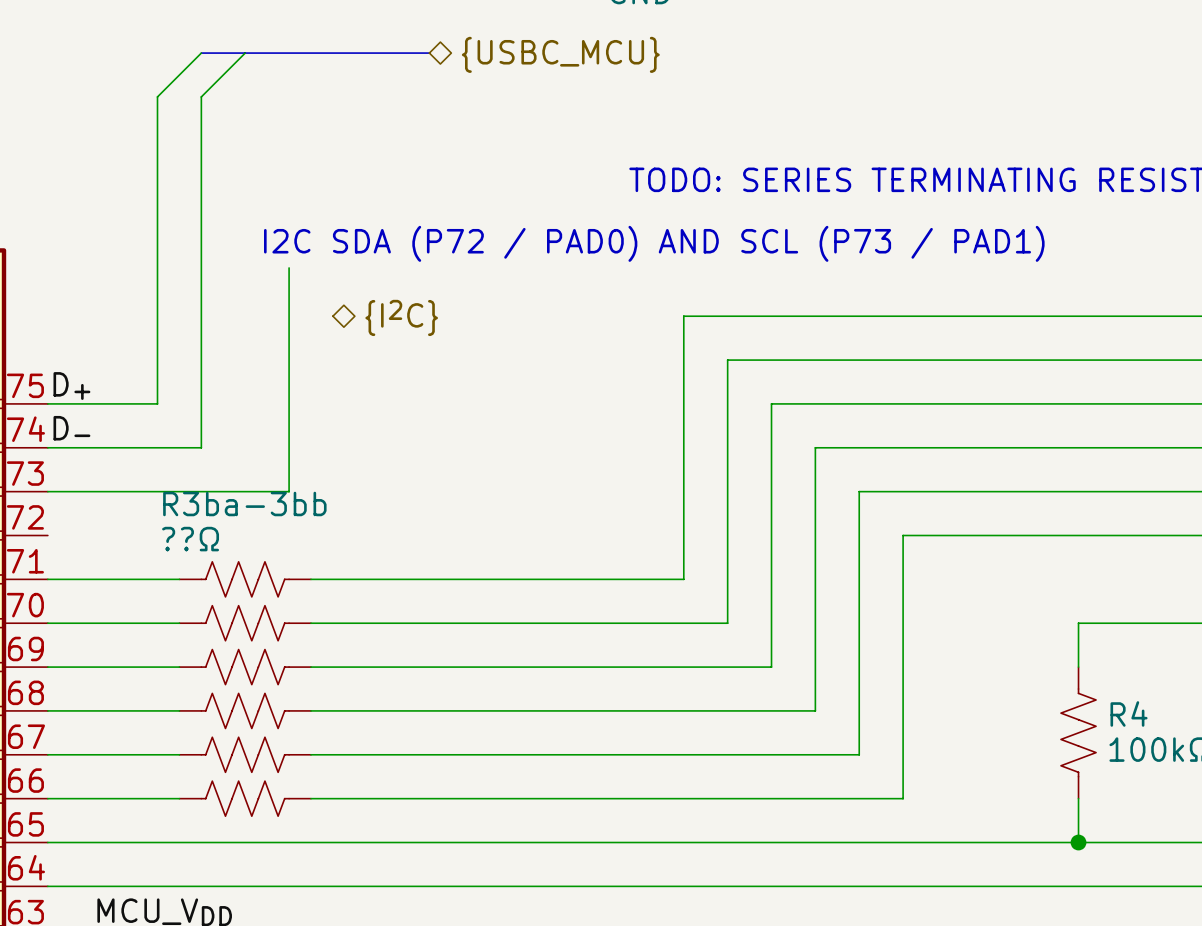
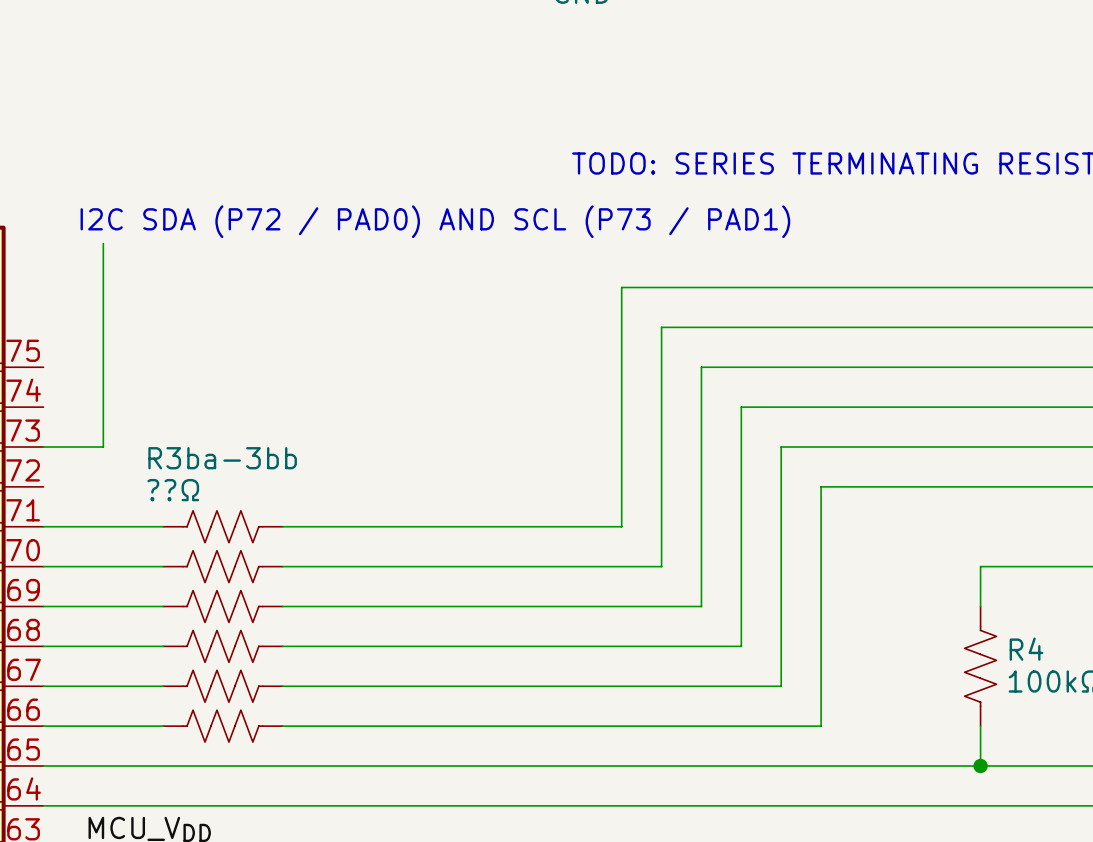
wire: (201, 53) (157, 96) (157, 403) (47, 403) -> none
bus: (201, 53) (429, 53) -> none
wire: (245, 53) (201, 96) (201, 447) (47, 447) -> none
hierarchical label: {USBC_MCU} (560, 54) -> none
text position: I2C SDA (P72 / PAD0) AND SCL (P73 / PAD1) (654, 243) -> I2C SDA (P72 / PAD0) AND SCL (P73 / PAD1) (435, 221)
wire: (289, 267) (289, 491) (113, 491) -> (103, 243) (103, 447)
hierarchical label: {I2C} (401, 317) -> none
label: D+ (71, 386) -> none
label: D- (71, 428) -> none

